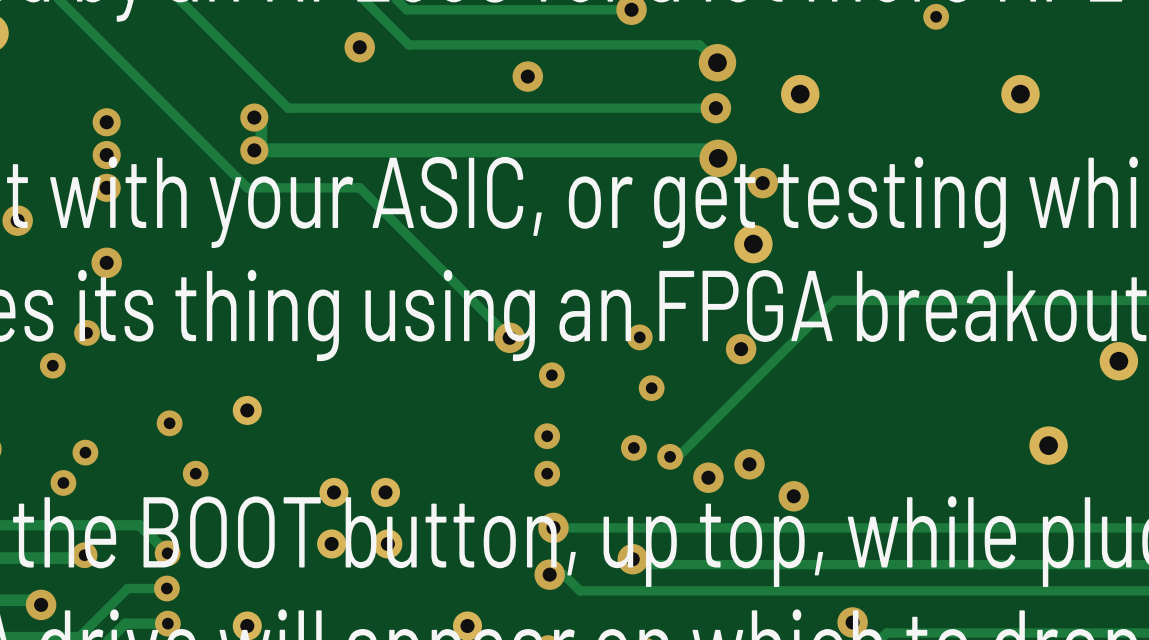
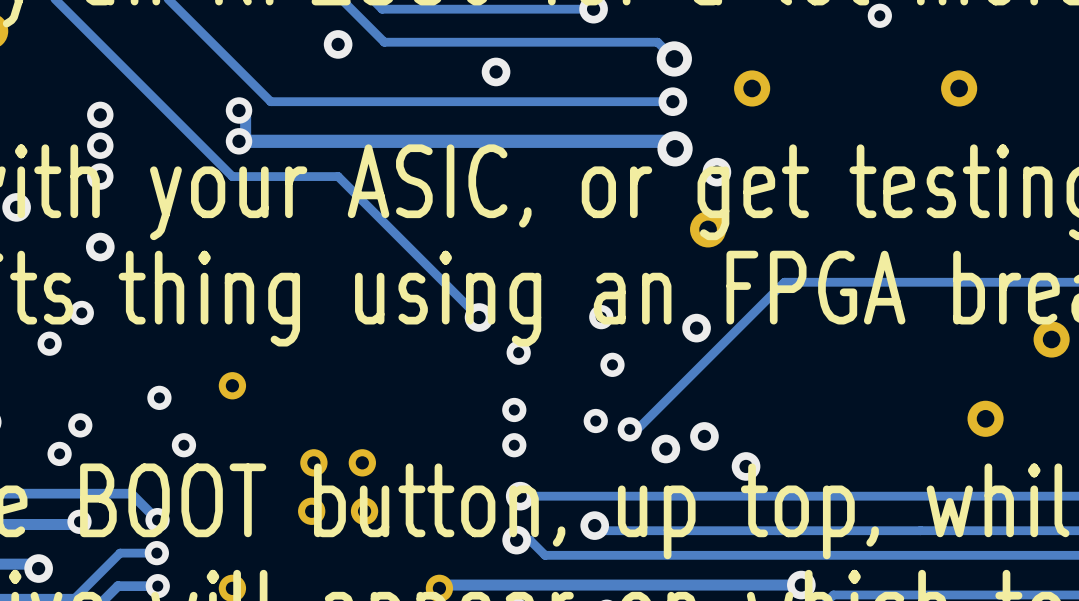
track: none -> (801, 585) (442, 585) (439, 588)

